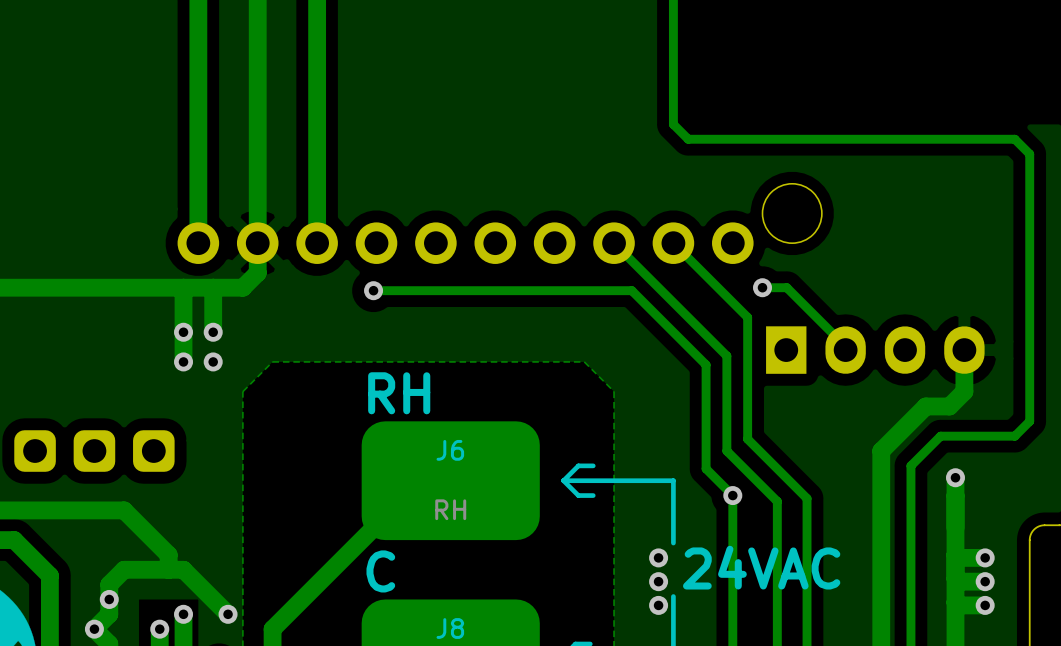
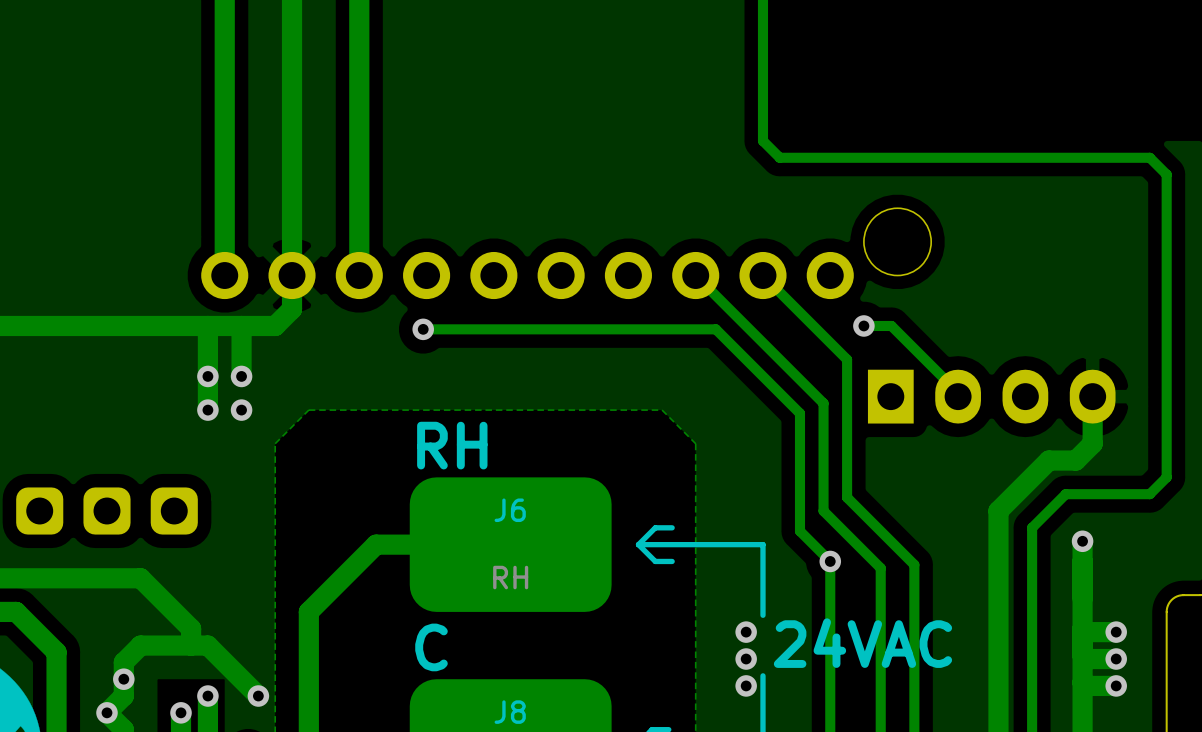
track: (421, 480) (272, 629) -> (477, 544) (376, 544) (308, 611) (308, 712)

